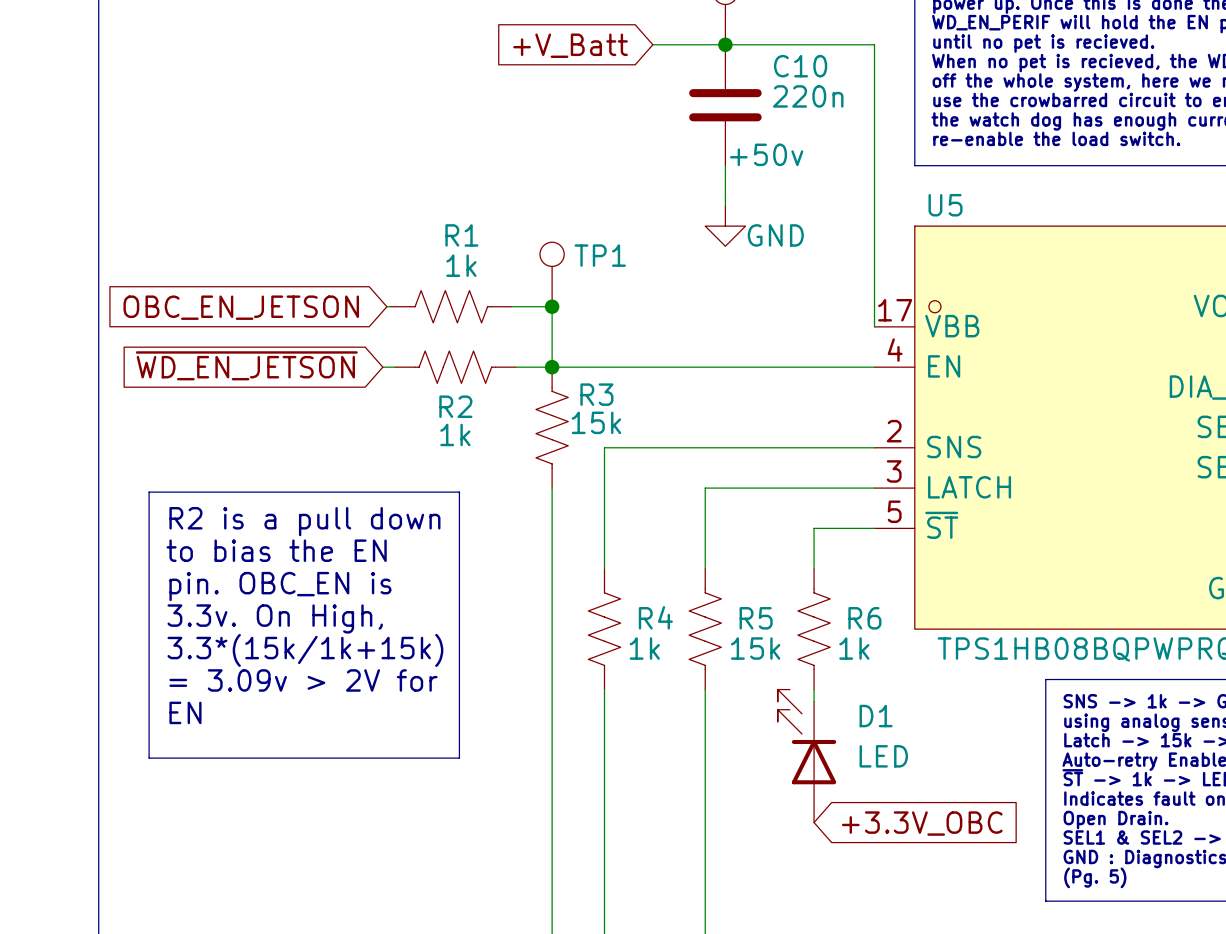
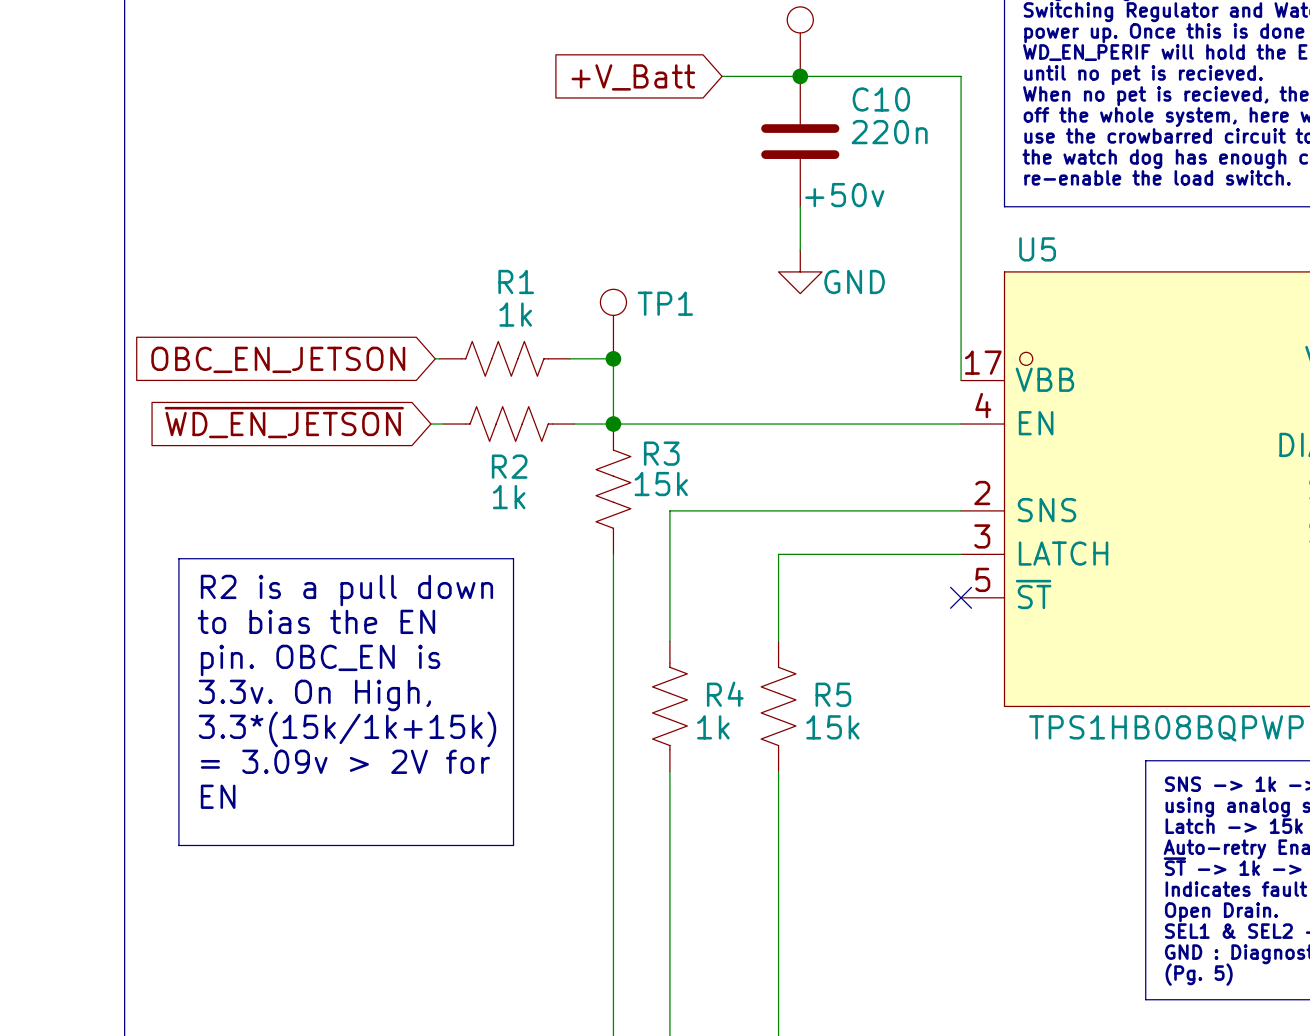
wire: (874, 528) (814, 528) (814, 568) -> none
no-connect mark: none -> (961, 597)
R6: 1k (814, 629) -> none
wire: (814, 689) (814, 701) -> none
D1: LED (807, 756) -> none
global label: +3.3V_OBC (922, 823) -> none

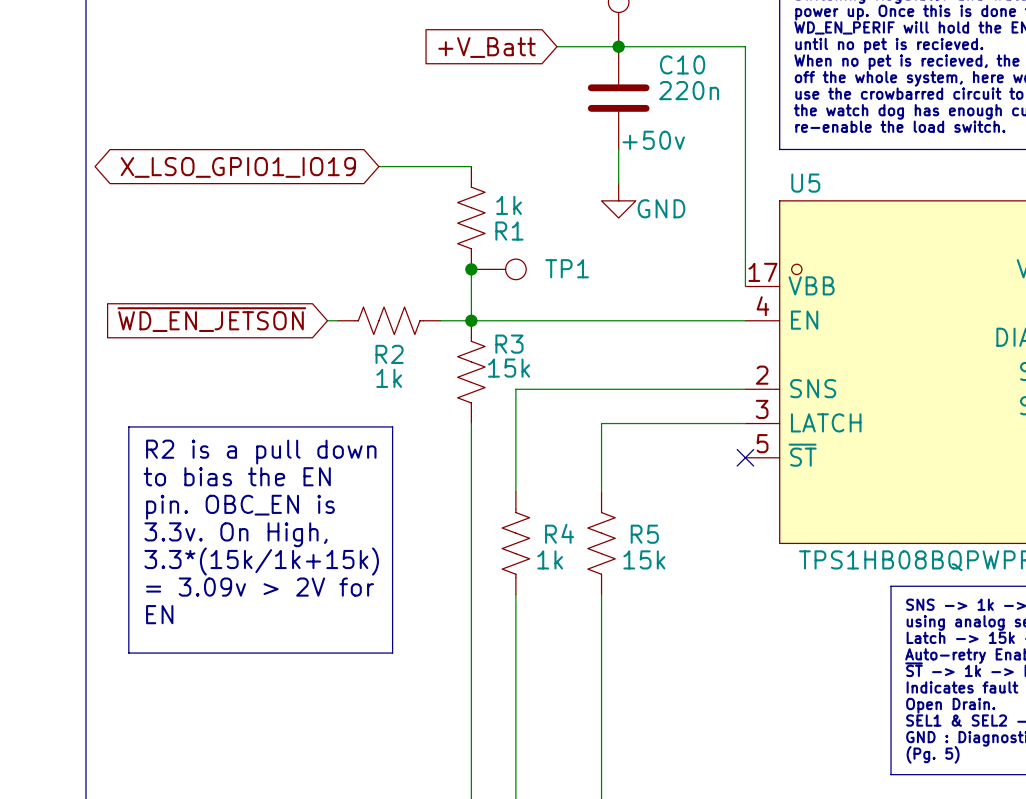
wire: none -> (378, 166) (471, 166)
global label: none -> X_LSO_GPIO1_IO19 (238, 167)
TP1 rotation: 0° (613, 302) -> 90° clockwise (515, 269)
TP1 name position: TP1 (665, 303) -> TP1 (567, 268)
TP1 position: (613, 324) -> (498, 269)
wire: (435, 358) (439, 358) -> none
R1 rotation: 0° (504, 358) -> 90° clockwise (471, 218)
R1 position: (504, 358) -> (471, 218)
wire: (569, 358) (613, 358) -> none
global label: OBC_EN_JETSON (278, 359) -> none

